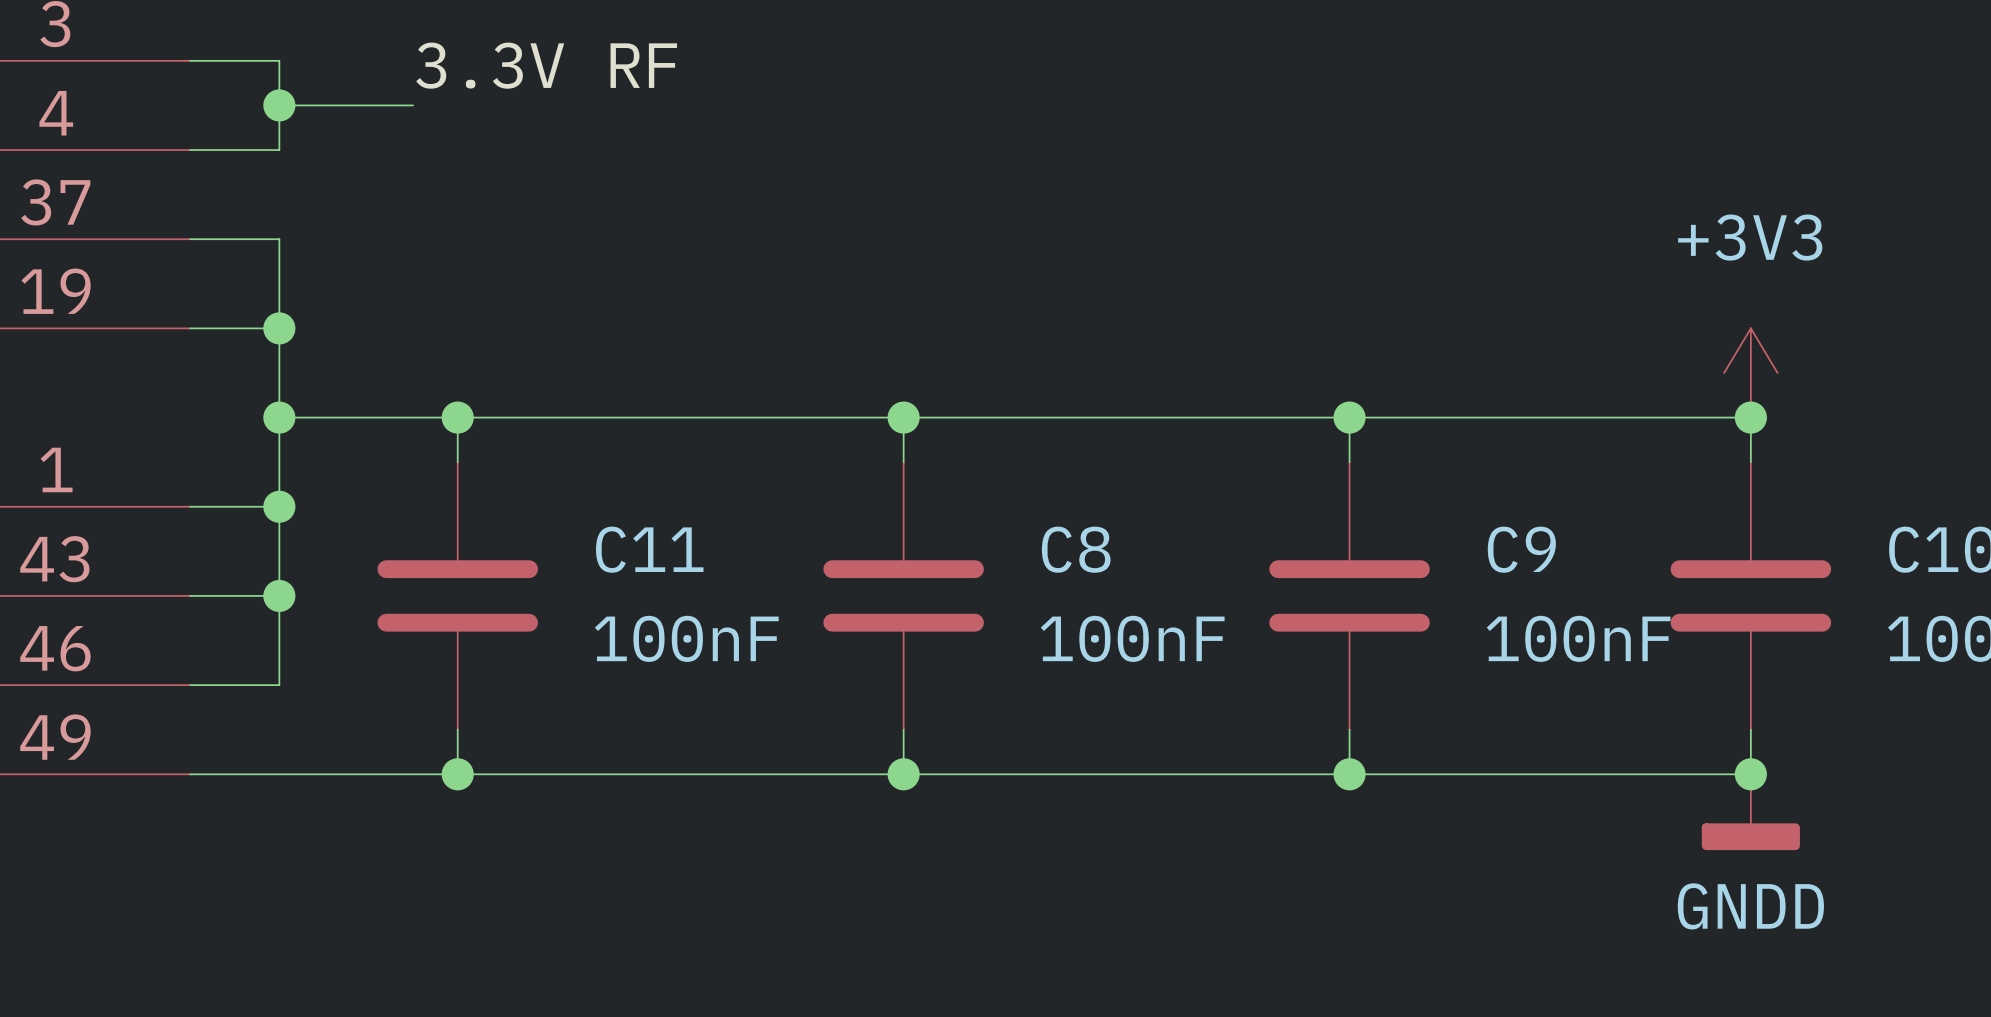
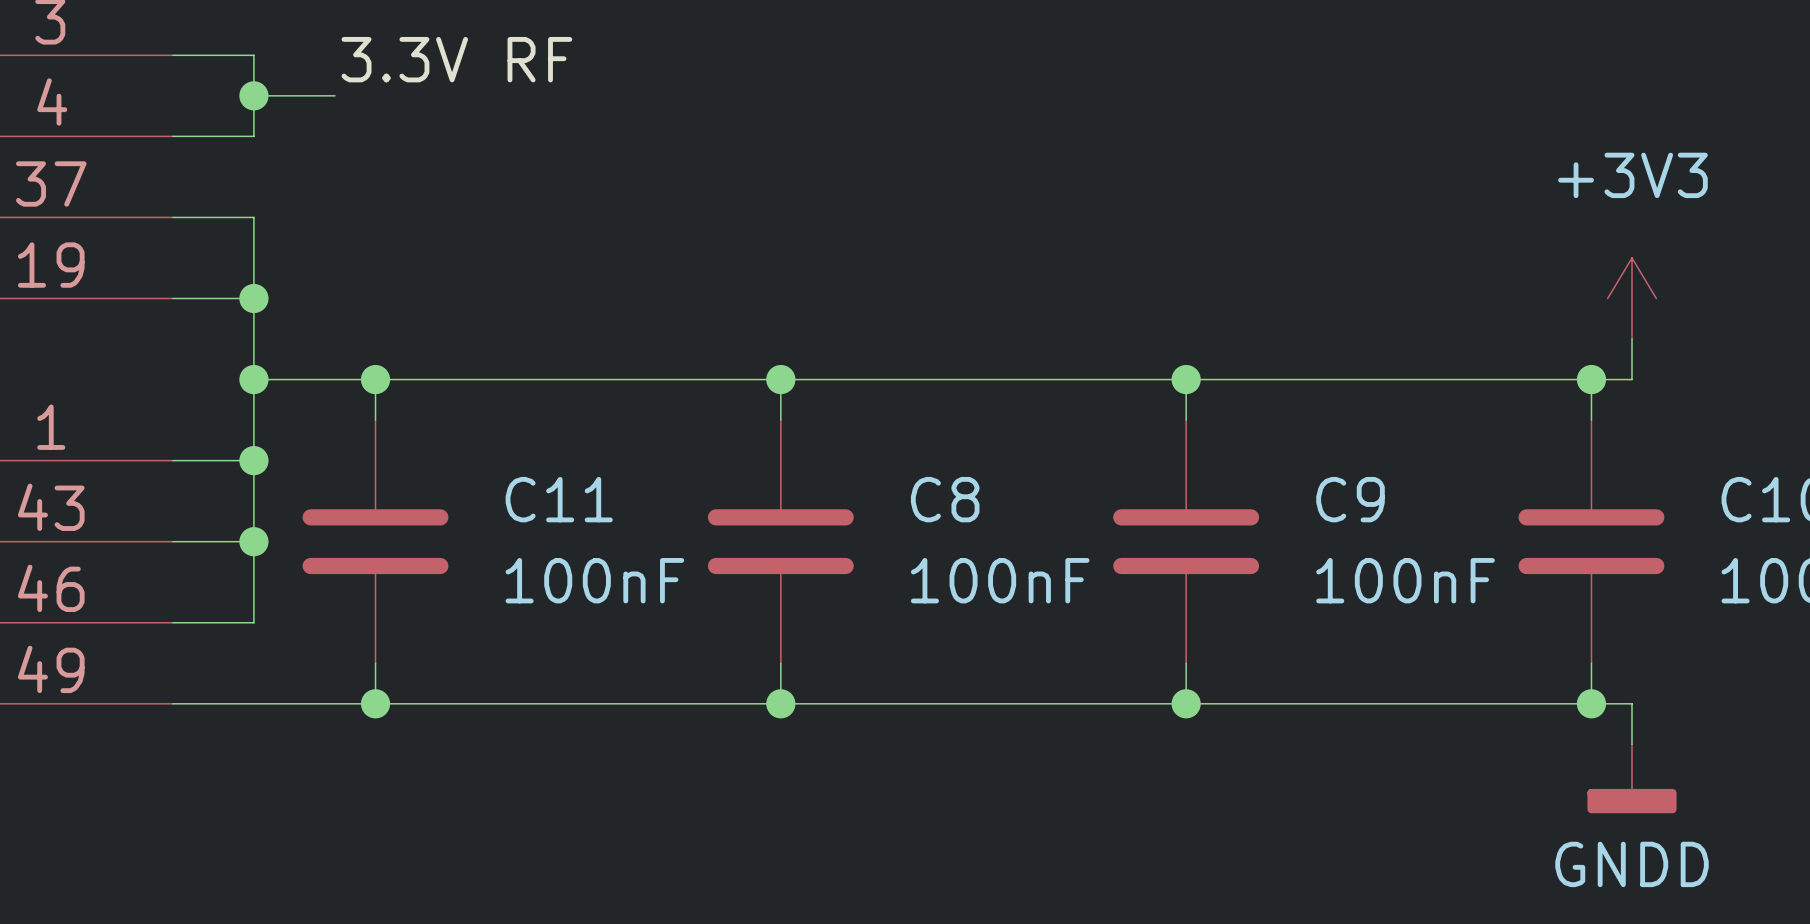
label position: 3.3V RF (546, 65) -> 3.3V RF (456, 59)
wire: (368, 105) (413, 105) -> none
power symbol position: +3V3 (1750, 372) -> +3V3 (1632, 298)
wire: none -> (1632, 339) (1632, 379) (1591, 379)
wire: (457, 417) (457, 462) -> (375, 379) (375, 420)
junction position: (457, 417) -> (375, 379)
wire: (903, 417) (903, 462) -> (780, 379) (780, 420)
junction position: (903, 417) -> (780, 379)
wire: (1349, 417) (1349, 462) -> (1186, 379) (1186, 420)
junction position: (1349, 417) -> (1186, 379)
C11 position: (457, 595) -> (375, 541)
C8 position: (903, 595) -> (780, 541)
C9 position: (1349, 595) -> (1186, 541)
wire: (457, 729) (457, 774) -> (375, 663) (375, 703)
wire: (903, 729) (903, 774) -> (780, 663) (780, 703)
wire: (1349, 729) (1349, 774) -> (1186, 663) (1186, 703)
junction position: (457, 774) -> (375, 703)
junction position: (903, 774) -> (780, 703)
junction position: (1349, 774) -> (1186, 703)
wire: none -> (1591, 703) (1632, 703) (1632, 744)
power symbol position: GNDD (1750, 812) -> GNDD (1632, 778)

